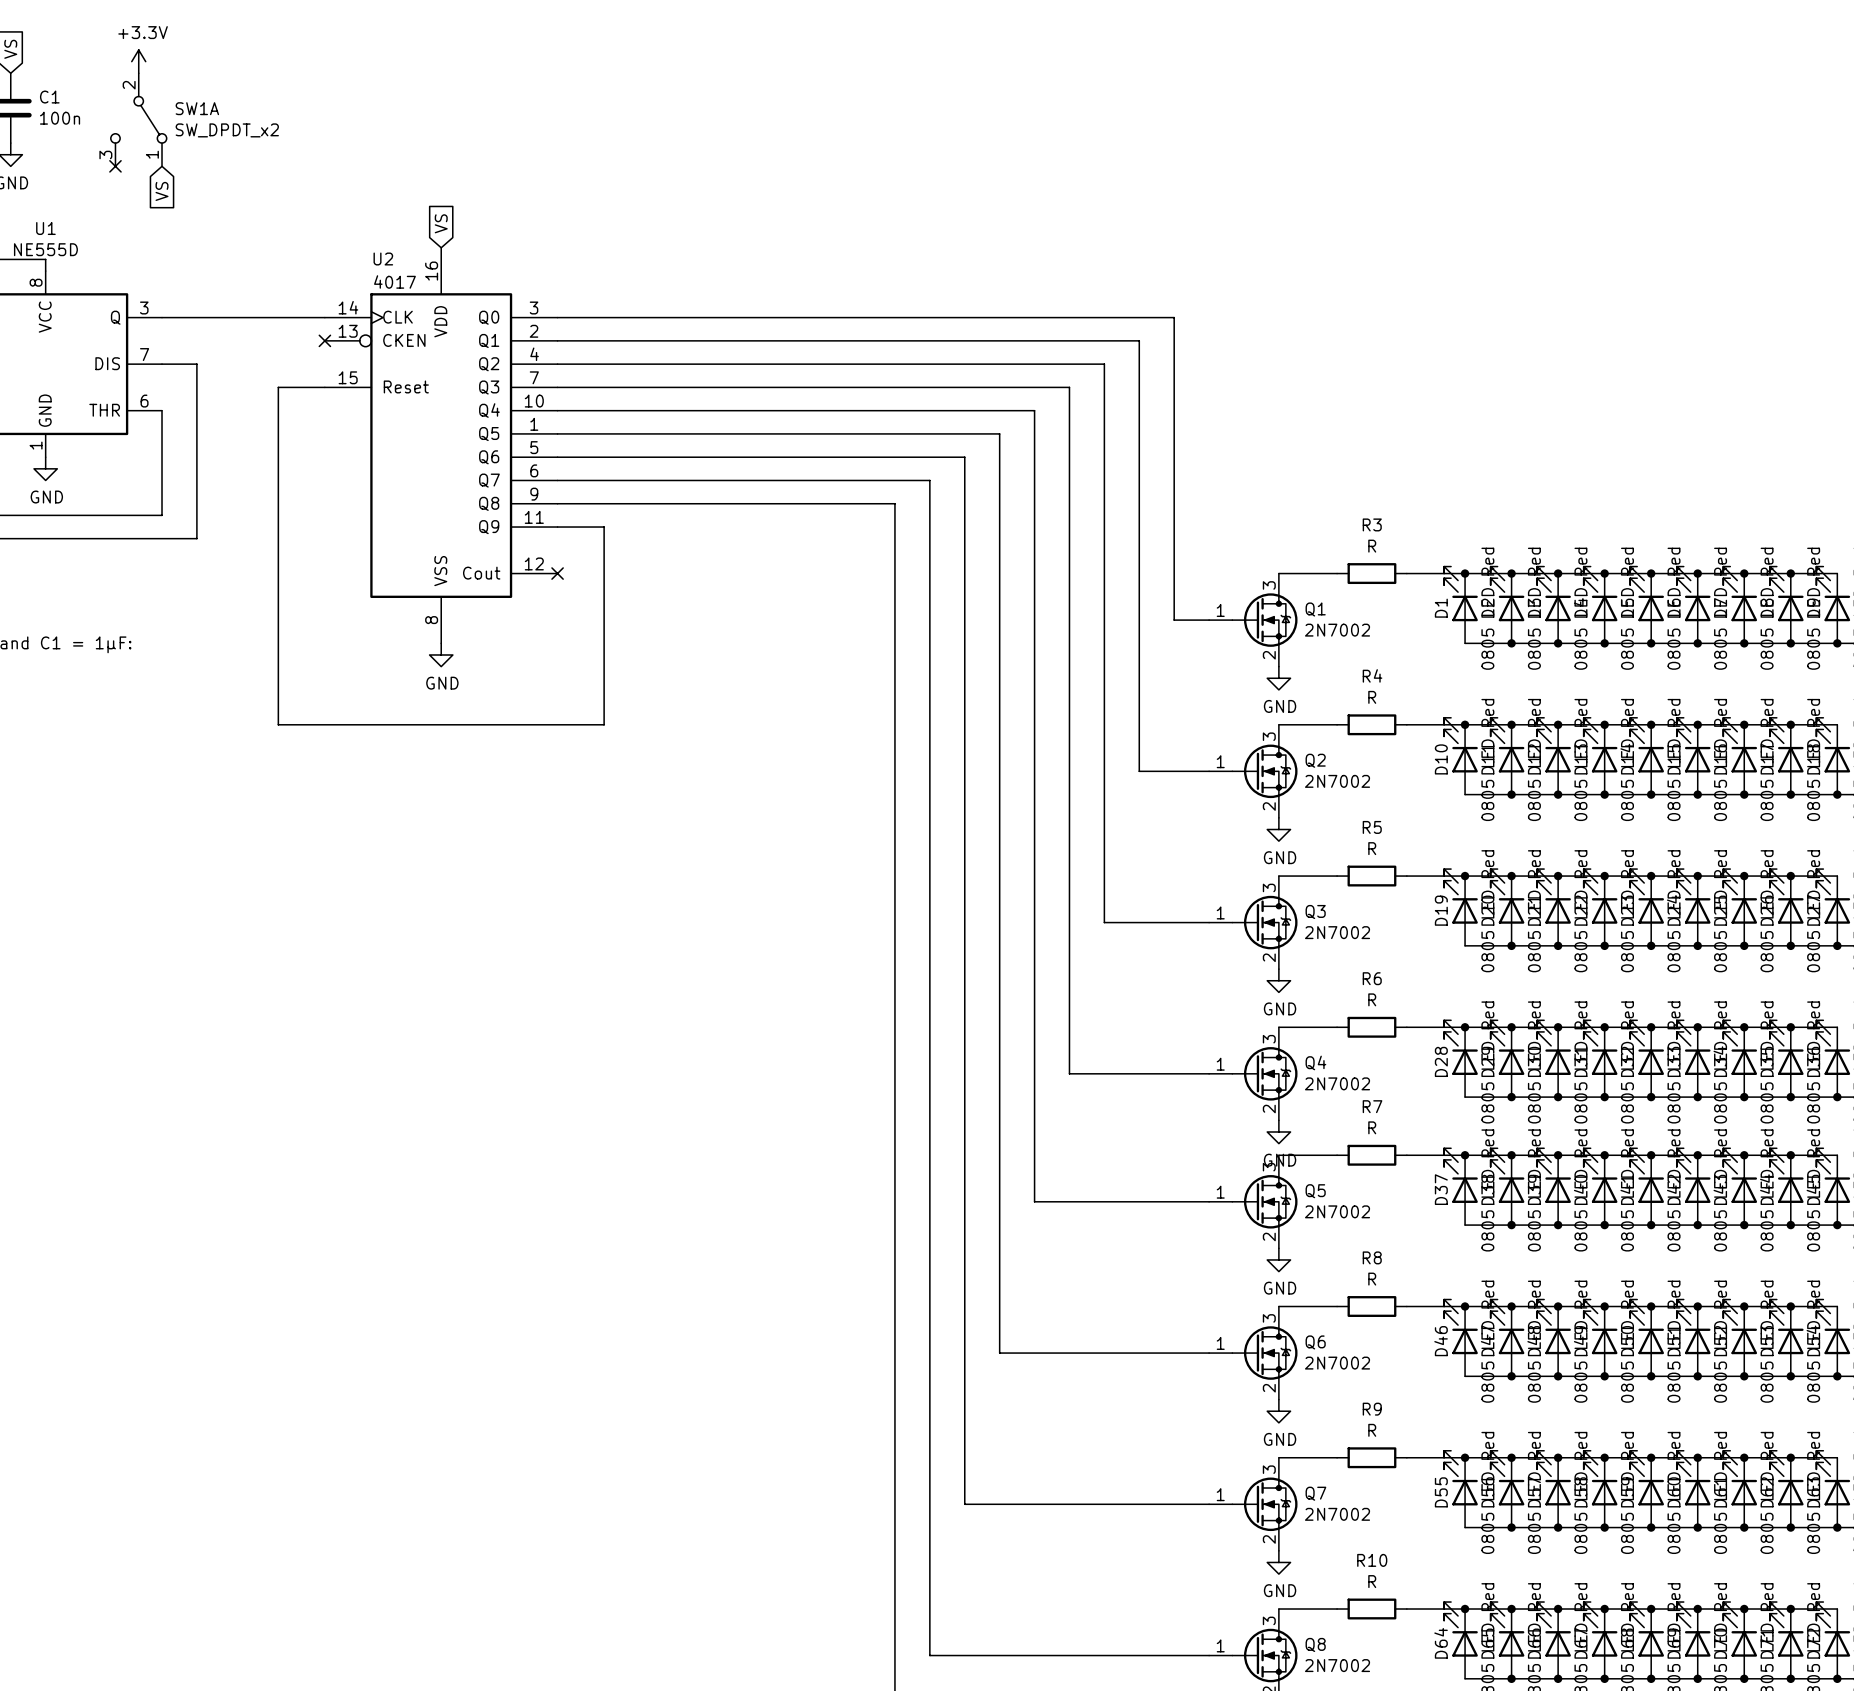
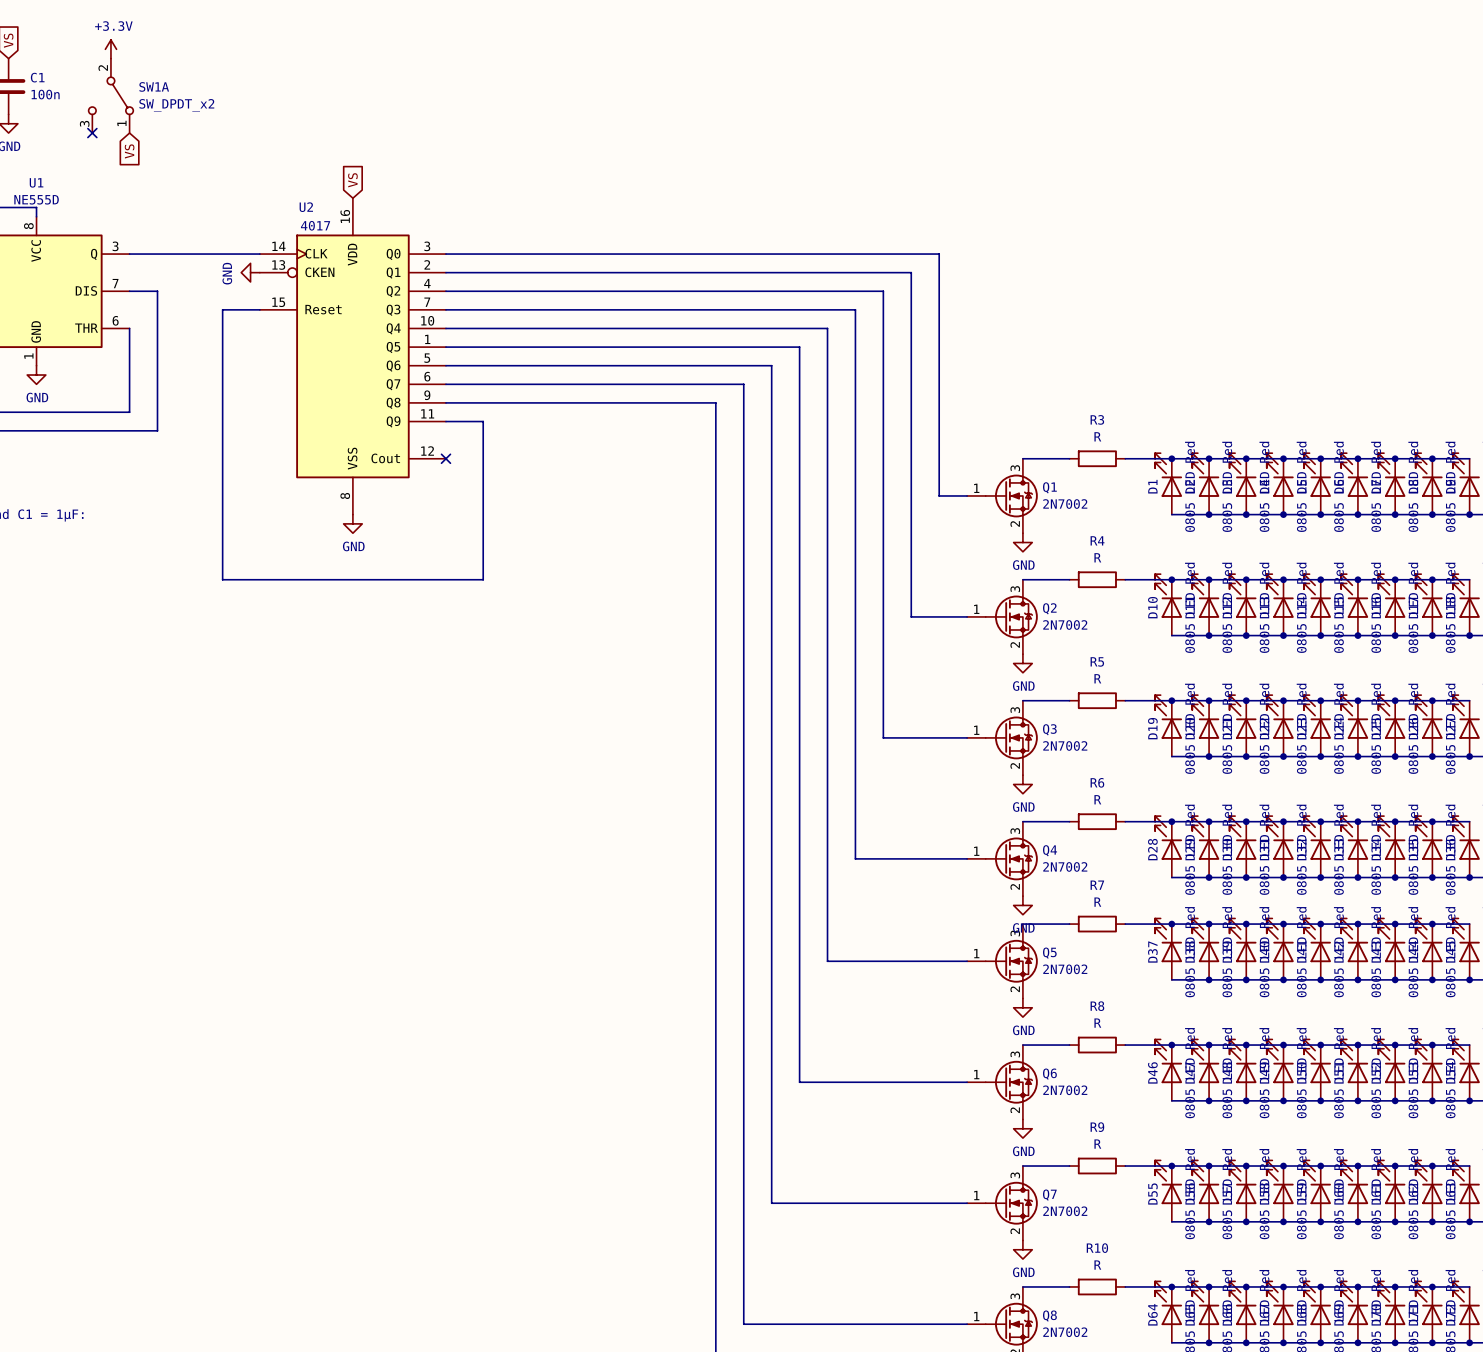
power symbol: none -> GND (250, 272)
no-connect mark: (324, 340) -> none

